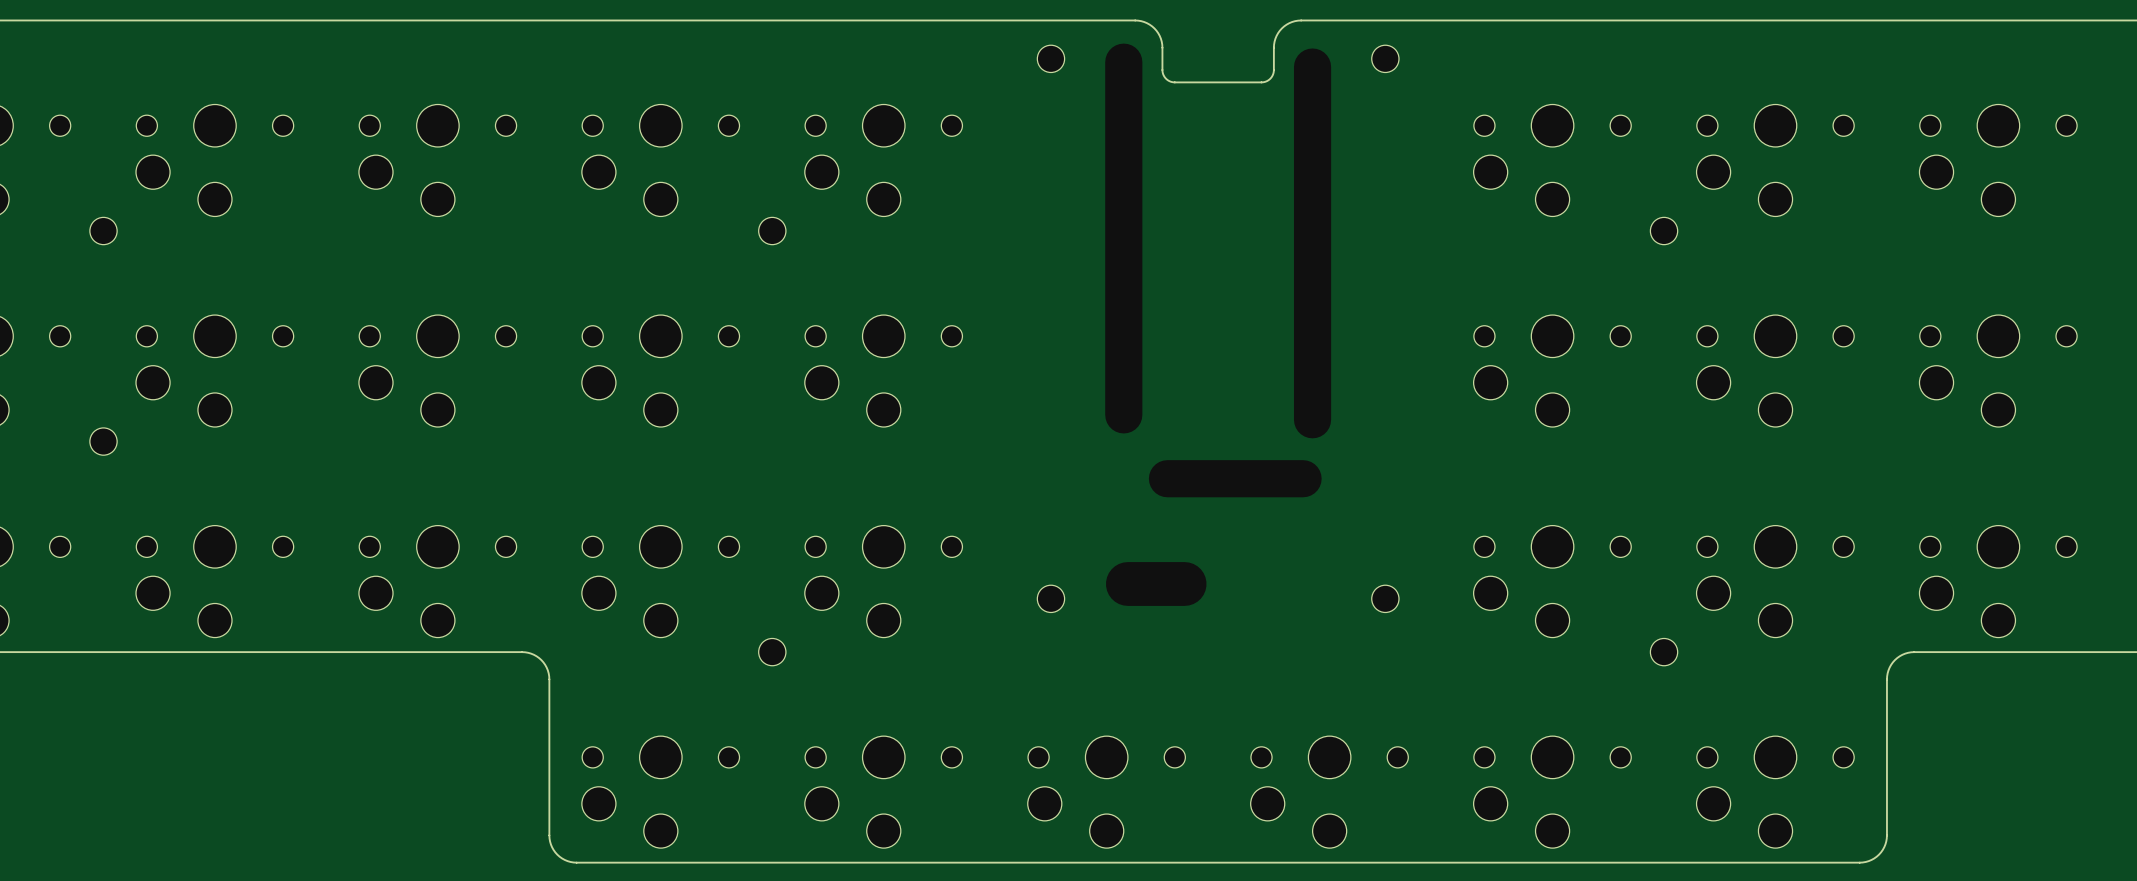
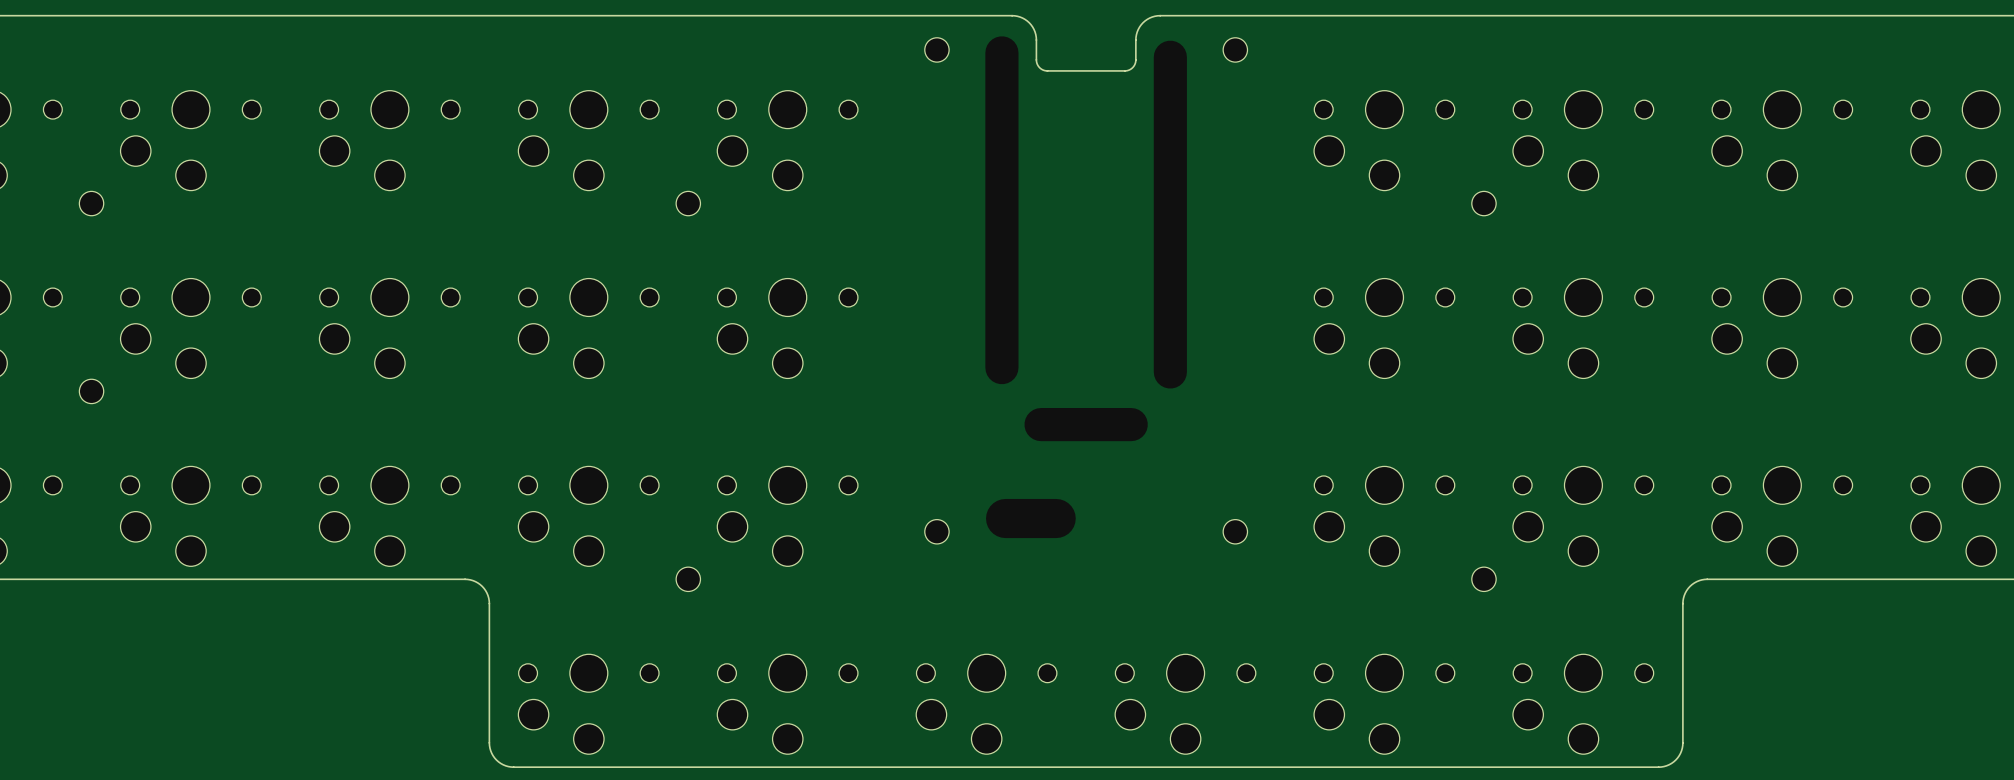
part: none -> (1086, 424)
part: (1235, 478) -> none

